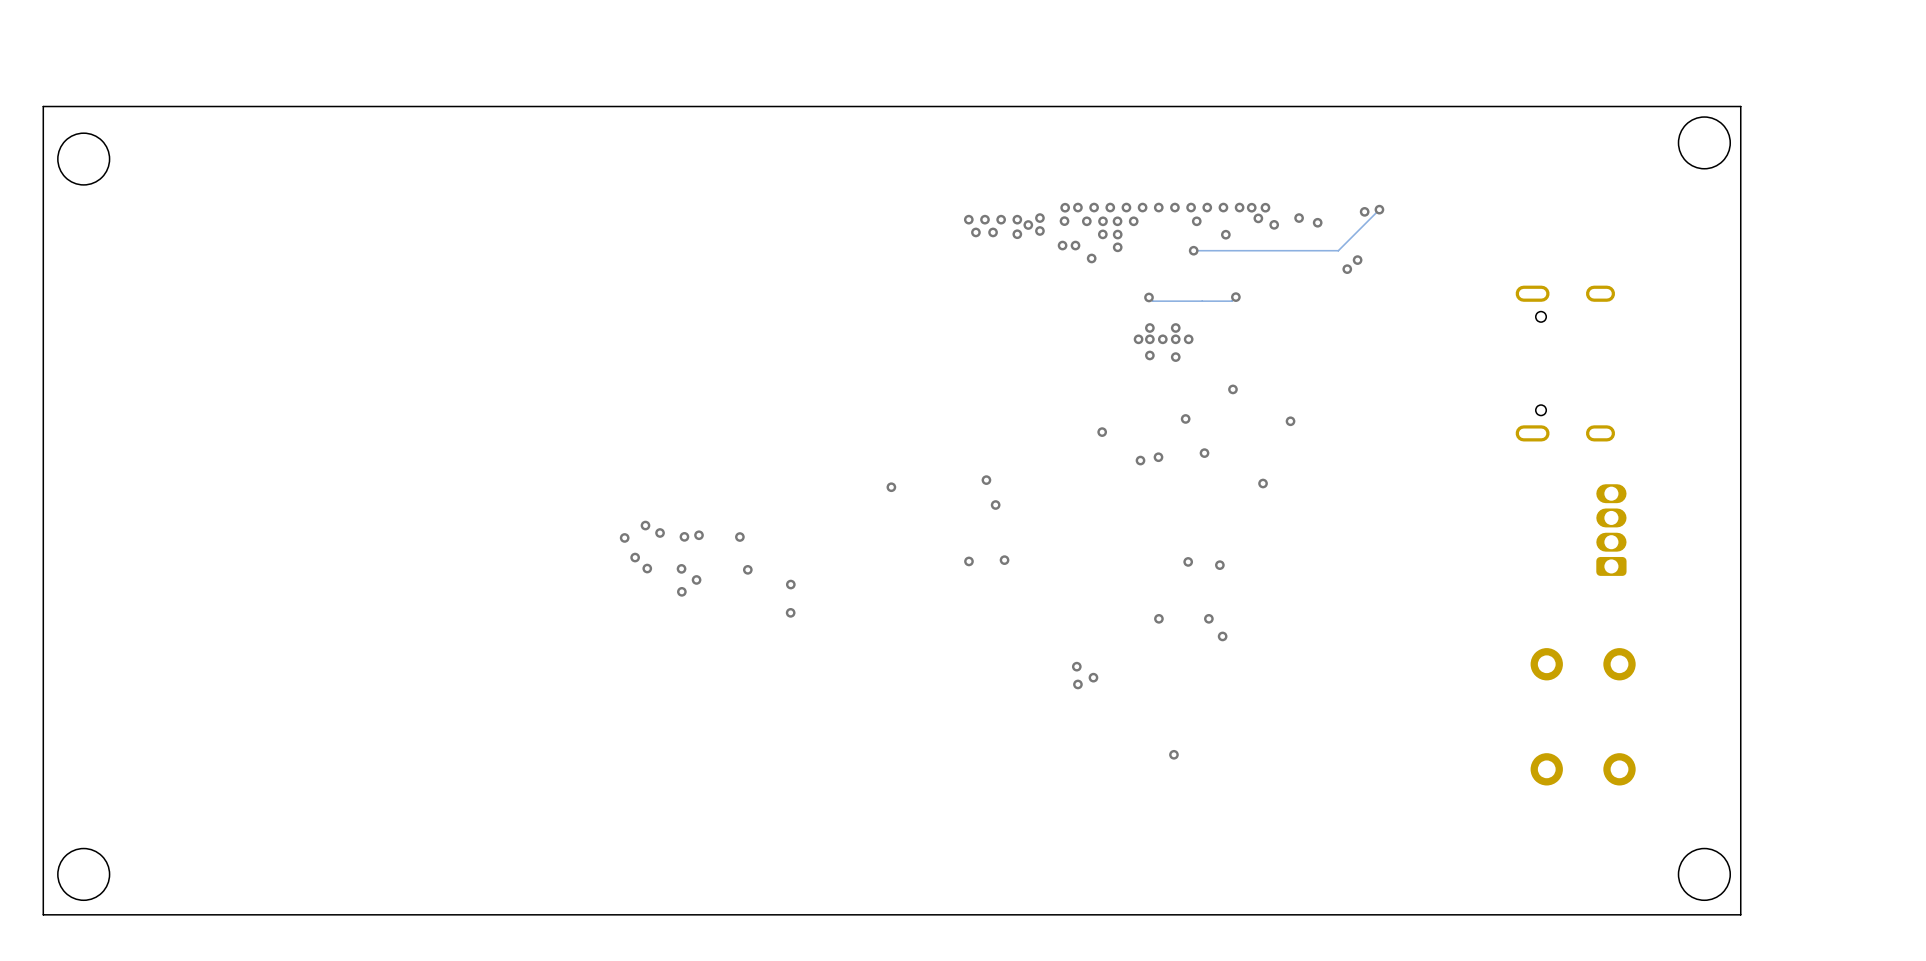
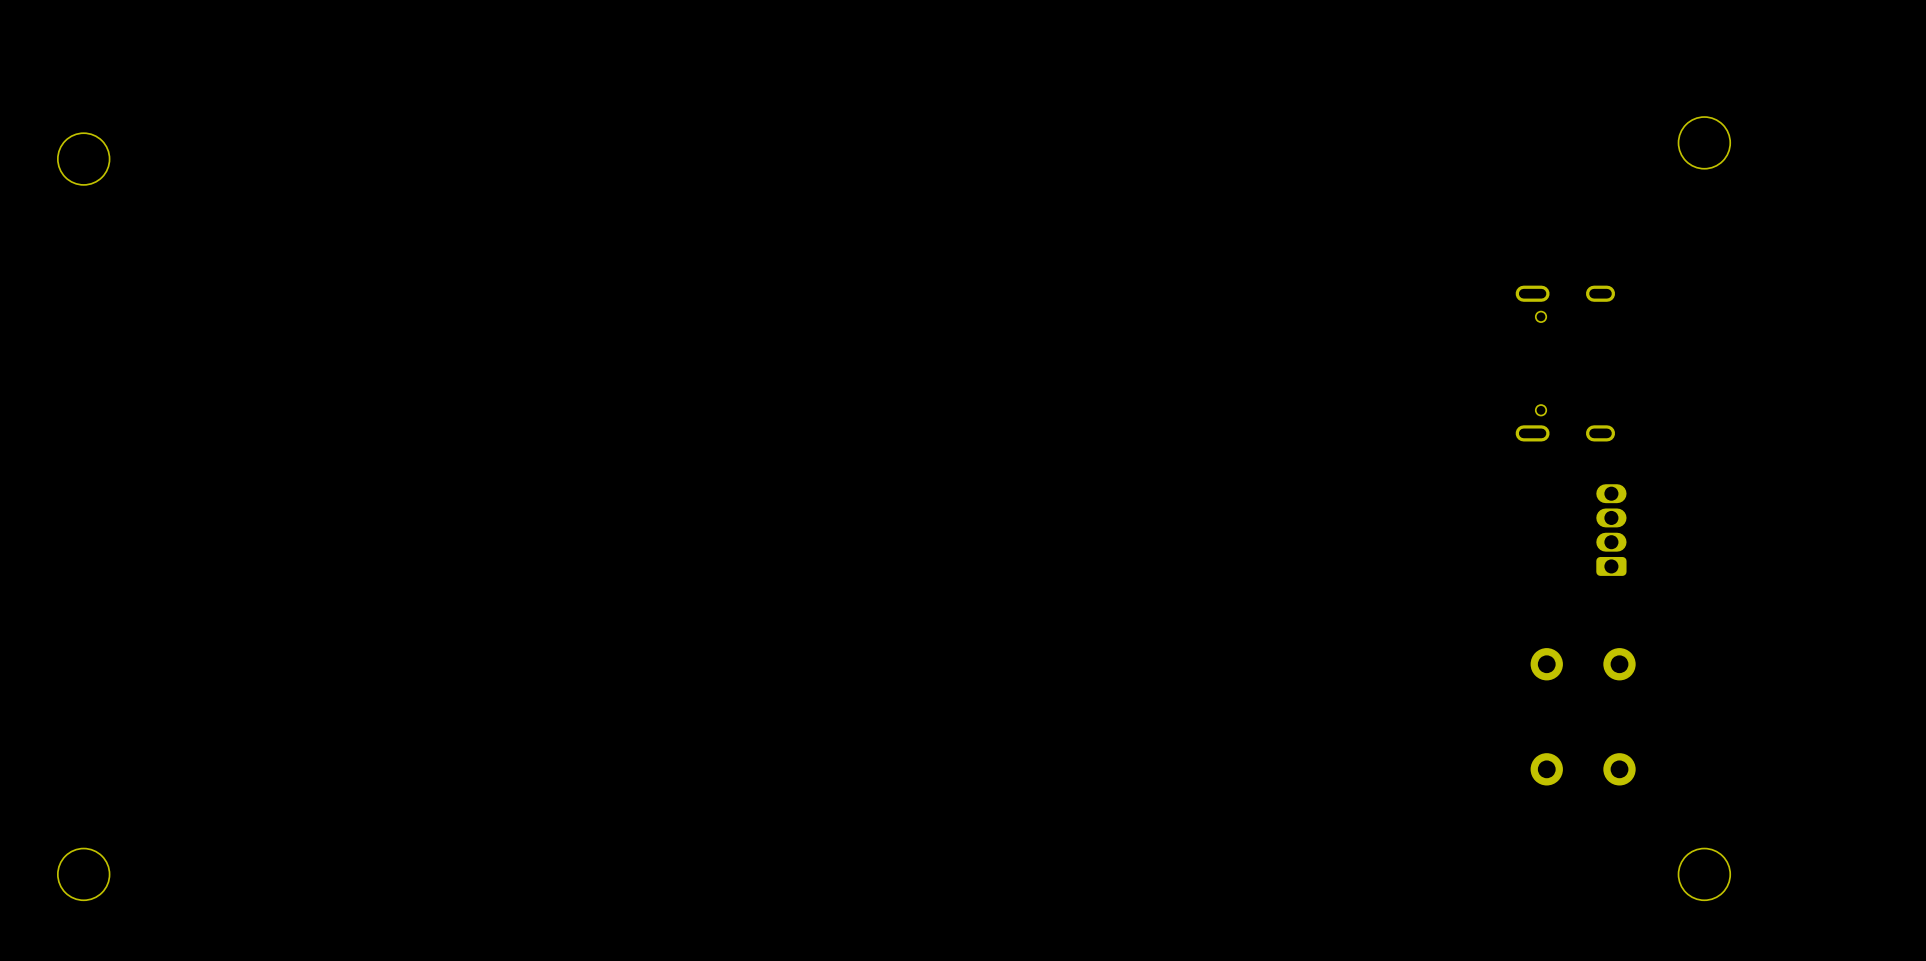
board edge: (1740, 106) (1740, 914) (43, 914) (43, 106) (1740, 106) -> none
via: (1065, 207) -> none
via: (1077, 207) -> none
via: (1094, 207) -> none
via: (1110, 207) -> none
via: (1126, 207) -> none
via: (1142, 207) -> none
via: (1158, 207) -> none
via: (1174, 207) -> none
via: (1191, 207) -> none
via: (1207, 207) -> none
via: (1223, 207) -> none
via: (1239, 207) -> none
via: (1251, 207) -> none
via: (1265, 207) -> none
track: (1379, 209) (1338, 250) (1193, 250) -> none
via: (1379, 209) -> none
via: (1364, 211) -> none
via: (1039, 218) -> none
via: (1258, 218) -> none
via: (1299, 218) -> none
via: (968, 219) -> none
via: (984, 219) -> none
via: (1001, 219) -> none
via: (1017, 219) -> none
via: (1064, 221) -> none
via: (1086, 221) -> none
via: (1102, 221) -> none
via: (1117, 221) -> none
via: (1133, 221) -> none
via: (1196, 221) -> none
via: (1317, 222) -> none
via: (1274, 224) -> none
via: (1028, 225) -> none
via: (1039, 230) -> none
via: (975, 232) -> none
via: (993, 232) -> none
via: (1017, 234) -> none
via: (1102, 234) -> none
via: (1117, 234) -> none
via: (1225, 234) -> none
via: (1062, 245) -> none
via: (1075, 245) -> none
via: (1117, 247) -> none
via: (1193, 250) -> none
via: (1091, 258) -> none
via: (1357, 260) -> none
via: (1347, 269) -> none
via: (1148, 297) -> none
track: (1235, 297) (1231, 301) (1152, 301) (1148, 297) -> none
via: (1235, 297) -> none
via: (1149, 327) -> none
via: (1175, 327) -> none
via: (1138, 339) -> none
via: (1149, 339) -> none
via: (1162, 339) -> none
via: (1175, 339) -> none
via: (1188, 339) -> none
via: (1149, 355) -> none
via: (1175, 357) -> none
via: (1232, 389) -> none
via: (1185, 418) -> none
via: (1290, 421) -> none
via: (1102, 432) -> none
via: (1204, 453) -> none
via: (1158, 457) -> none
via: (1140, 460) -> none
via: (986, 480) -> none
via: (1263, 483) -> none
via: (891, 487) -> none
via: (995, 505) -> none
via: (645, 525) -> none
via: (660, 532) -> none
via: (699, 535) -> none
via: (684, 536) -> none
via: (624, 537) -> none
via: (739, 537) -> none
via: (635, 557) -> none
via: (1004, 560) -> none
via: (968, 561) -> none
via: (1188, 561) -> none
via: (1219, 565) -> none
via: (647, 568) -> none
via: (681, 568) -> none
via: (747, 569) -> none
via: (696, 579) -> none
via: (790, 584) -> none
via: (681, 591) -> none
via: (790, 612) -> none
via: (1158, 618) -> none
via: (1208, 618) -> none
via: (1222, 636) -> none
via: (1076, 666) -> none
via: (1093, 677) -> none
via: (1077, 684) -> none
via: (1173, 754) -> none

